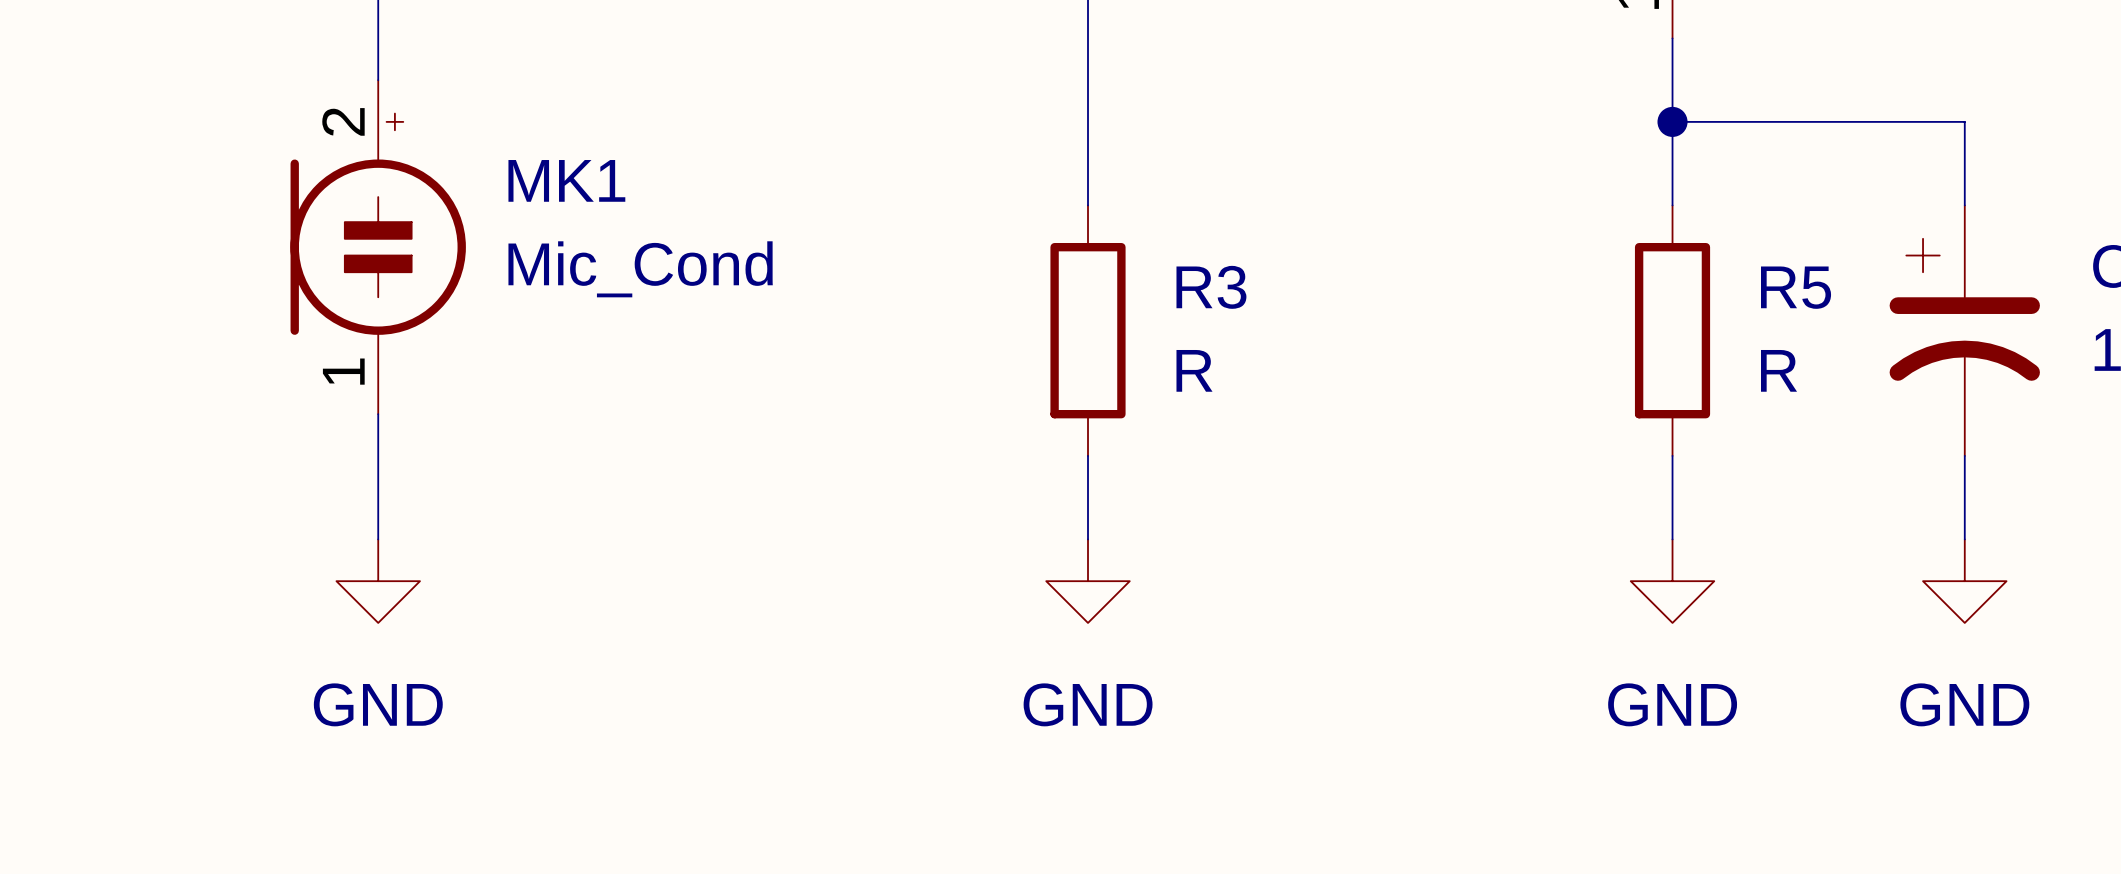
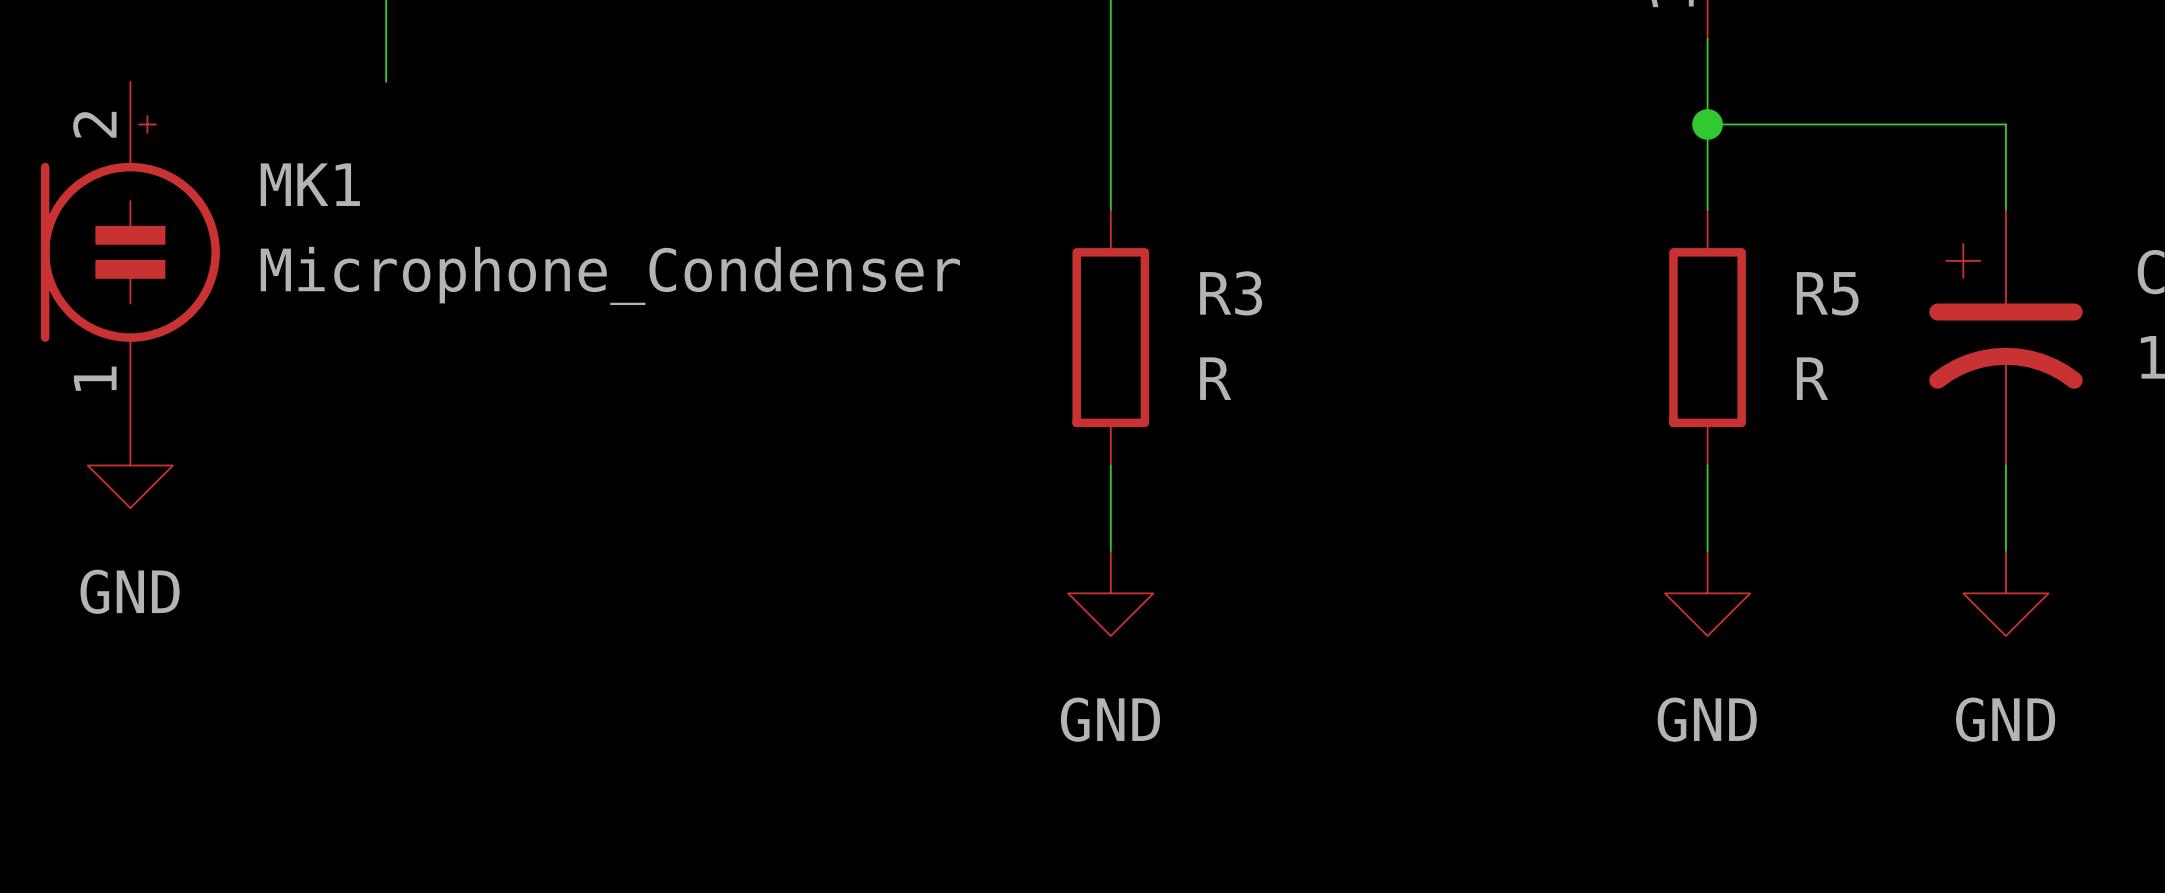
MK1 position: (378, 247) -> (130, 252)
MK1 value: Mic_Cond (640, 269) -> Microphone_Condenser (610, 275)
wire: (378, 414) (378, 539) -> none
power symbol position: GND (378, 581) -> GND (130, 465)

